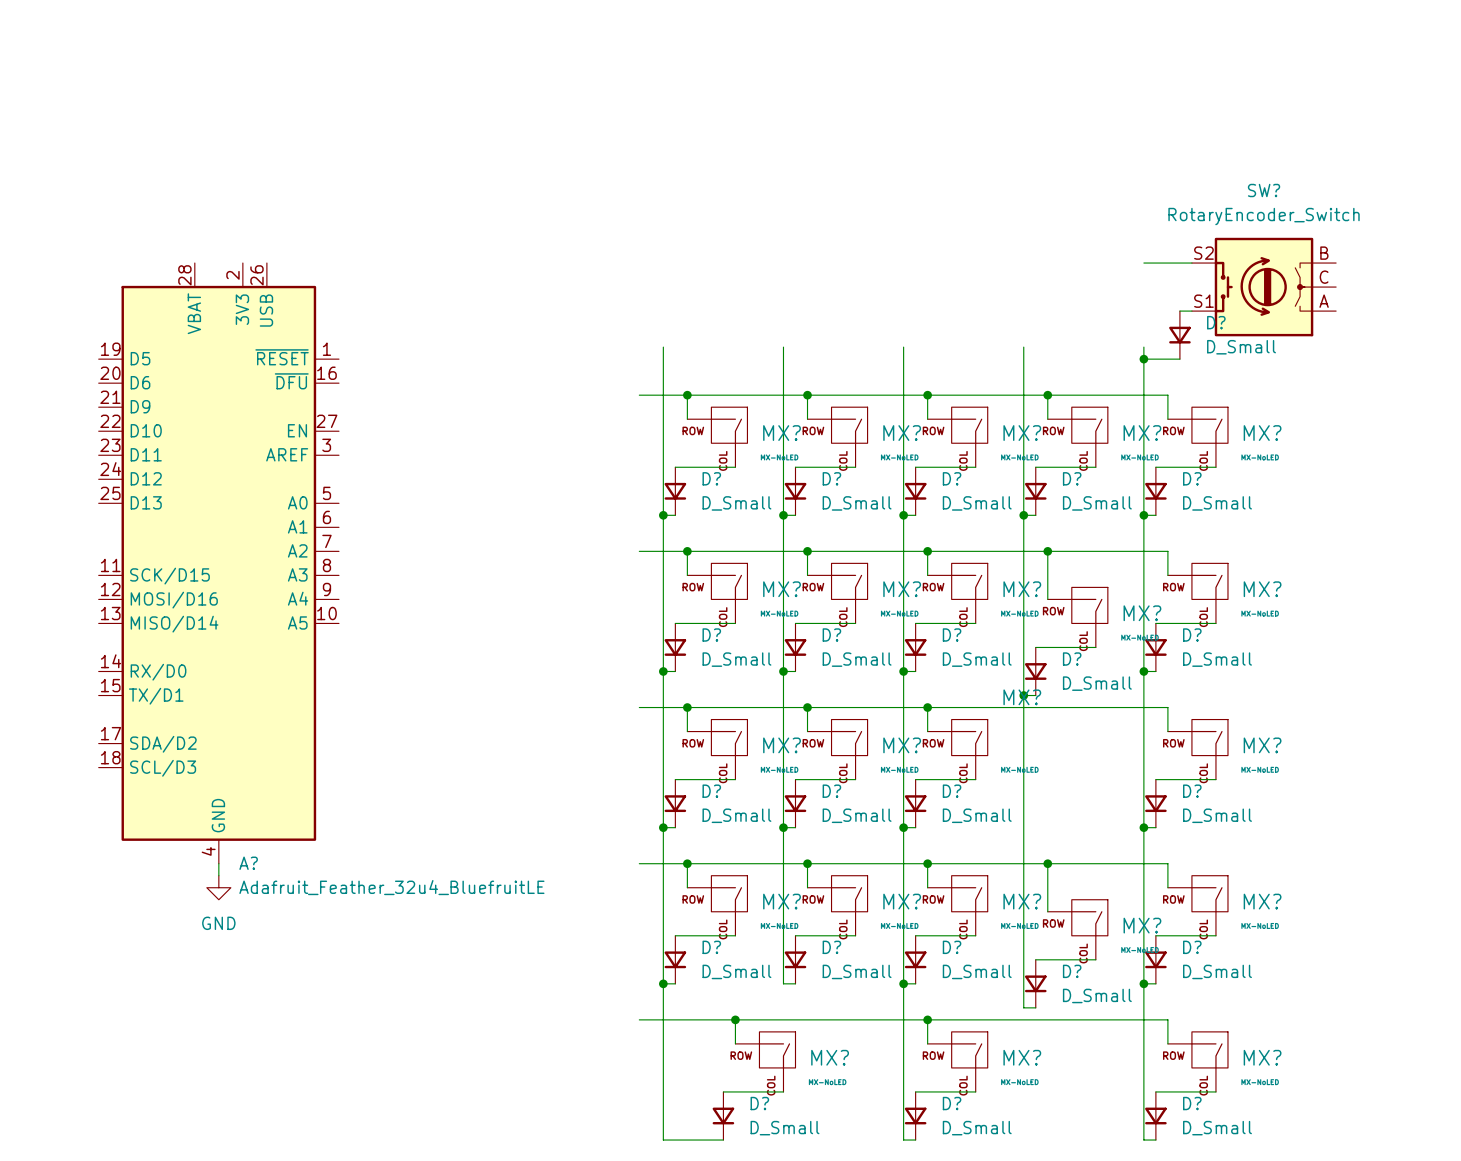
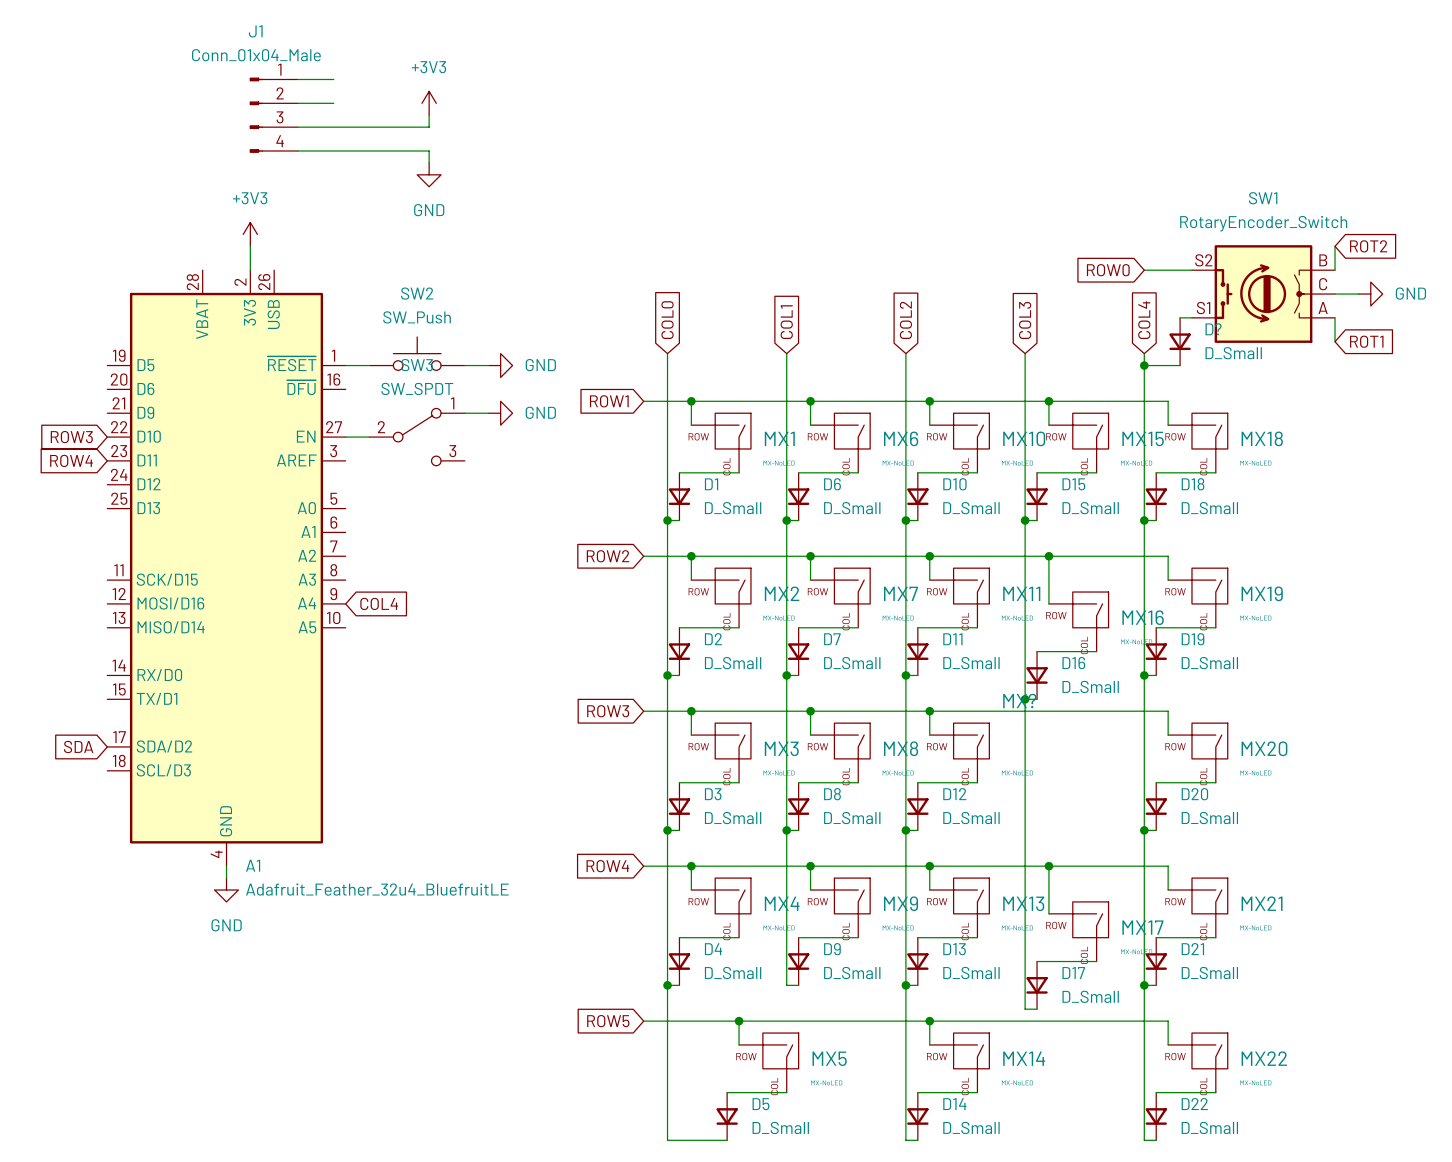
wire: none -> (298, 79) (333, 79)
wire: none -> (298, 103) (333, 103)
power symbol: none -> +3V3 (429, 103)
J1: none -> Conn_01x04_Male (273, 115)
wire: none -> (429, 115) (429, 127) (298, 127)
wire: none -> (298, 151) (429, 151) (429, 162)
power symbol: none -> GND (429, 174)
SW? name: SW? (1264, 190) -> SW1 (1263, 198)
power symbol: none -> +3V3 (250, 234)
wire: none -> (250, 246) (250, 270)
wire: none -> (1335, 246) (1335, 270)
global label: none -> ROT2 (1368, 246)
global label: none -> ROW0 (1108, 270)
wire: none -> (1335, 294) (1358, 294)
power symbol: none -> GND (1370, 294)
global label: none -> COL0 (667, 320)
global label: none -> COL1 (786, 322)
global label: none -> COL2 (905, 320)
global label: none -> COL3 (1025, 320)
global label: none -> COL4 (1144, 320)
wire: none -> (1335, 317) (1335, 341)
global label: none -> ROT1 (1366, 341)
SW2: none -> SW_Push (417, 353)
wire: none -> (345, 365) (369, 365)
wire: none -> (464, 365) (488, 365)
power symbol: none -> GND (500, 365)
global label: none -> ROW1 (609, 401)
wire: none -> (464, 413) (488, 413)
power symbol: none -> GND (500, 413)
global label: none -> ROW3 (71, 437)
wire: none -> (345, 437) (369, 437)
SW3: none -> SW_SPDT (417, 437)
MX? name: MX? (782, 433) -> MX1 (779, 438)
MX? name: MX? (902, 433) -> MX6 (901, 438)
MX? name: MX? (1022, 433) -> MX10 (1024, 438)
MX? name: MX? (1142, 433) -> MX15 (1143, 438)
MX? name: MX? (1262, 433) -> MX18 (1262, 438)
global label: none -> ROW4 (71, 460)
D? name: D? (711, 478) -> D1 (711, 484)
D? name: D? (831, 478) -> D6 (832, 484)
D? name: D? (952, 478) -> D10 (954, 484)
D? name: D? (1072, 478) -> D15 (1073, 484)
D? name: D? (1192, 478) -> D18 (1193, 484)
global label: none -> ROW2 (608, 556)
MX? name: MX? (782, 589) -> MX2 (782, 593)
MX? name: MX? (902, 589) -> MX7 (900, 593)
MX? name: MX? (1022, 589) -> MX11 (1021, 593)
MX? name: MX? (1262, 589) -> MX19 (1262, 593)
global label: none -> COL4 (379, 603)
MX? name: MX? (1142, 613) -> MX16 (1143, 617)
D? name: D? (711, 635) -> D2 (713, 639)
D? name: D? (831, 635) -> D7 (832, 639)
D? name: D? (952, 635) -> D11 (952, 639)
D? name: D? (1192, 635) -> D19 (1192, 639)
D? name: D? (1072, 659) -> D16 (1073, 663)
global label: none -> ROW3 (608, 711)
global label: none -> SDA (78, 746)
MX? name: MX? (782, 745) -> MX3 (781, 748)
MX? name: MX? (902, 745) -> MX8 (901, 748)
MX? name: MX? (1262, 745) -> MX20 (1264, 748)
D? name: D? (711, 791) -> D3 (713, 794)
D? name: D? (831, 791) -> D8 (832, 794)
D? name: D? (952, 791) -> D12 (954, 794)
D? name: D? (1192, 791) -> D20 (1194, 794)
A? name: A? (248, 863) -> A1 (253, 865)
global label: none -> ROW4 (607, 866)
MX? name: MX? (782, 901) -> MX4 (782, 903)
MX? name: MX? (902, 901) -> MX9 (901, 903)
MX? name: MX? (1022, 901) -> MX13 (1023, 903)
MX? name: MX? (1262, 901) -> MX21 (1262, 903)
MX? name: MX? (1142, 925) -> MX17 (1142, 927)
D? name: D? (711, 947) -> D4 (713, 949)
D? name: D? (831, 947) -> D9 (832, 949)
D? name: D? (952, 947) -> D13 (954, 949)
D? name: D? (1192, 947) -> D21 (1192, 949)
D? name: D? (1072, 971) -> D17 (1073, 972)
global label: none -> ROW5 (608, 1021)
MX? name: MX? (830, 1057) -> MX5 (829, 1058)
MX? name: MX? (1022, 1057) -> MX14 (1024, 1058)
MX? name: MX? (1262, 1057) -> MX22 (1264, 1058)
D? name: D? (759, 1103) -> D5 (760, 1104)
D? name: D? (952, 1103) -> D14 (954, 1104)
D? name: D? (1192, 1103) -> D22 (1194, 1104)

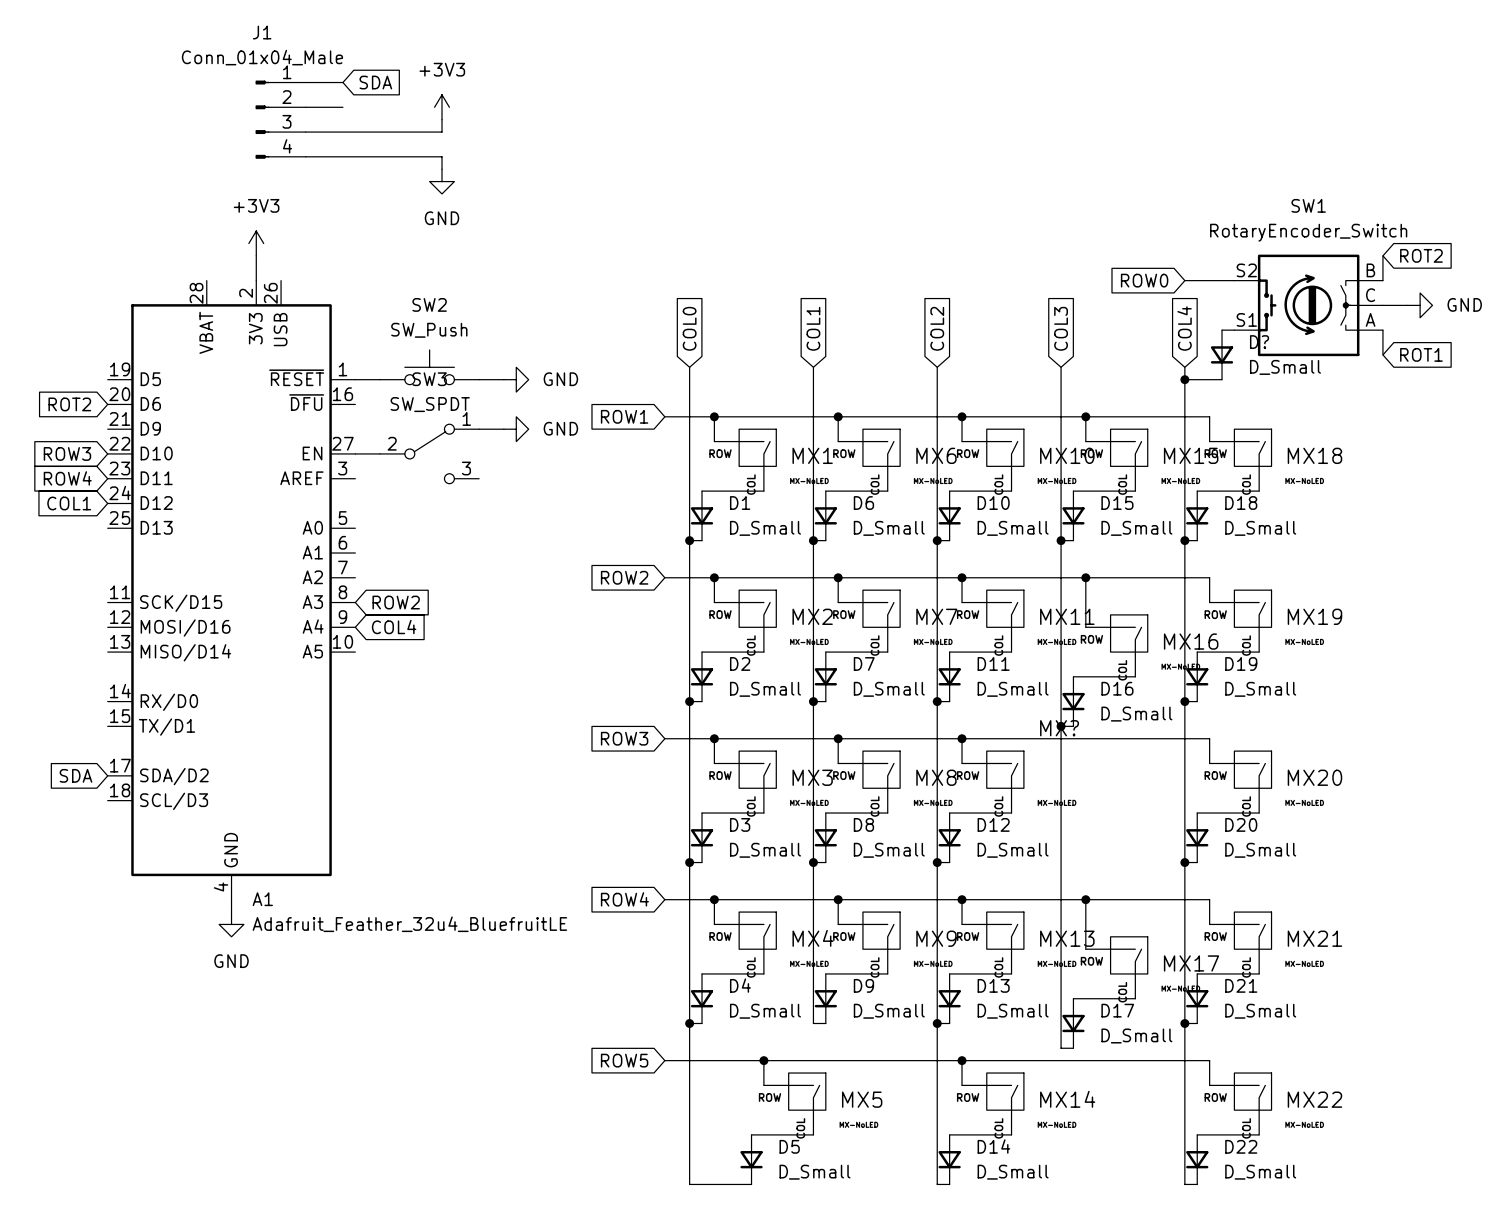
global label: none -> SDA (375, 82)
global label: none -> ROT2 (69, 404)
global label: none -> COL1 (69, 503)
global label: none -> ROW2 (396, 602)

